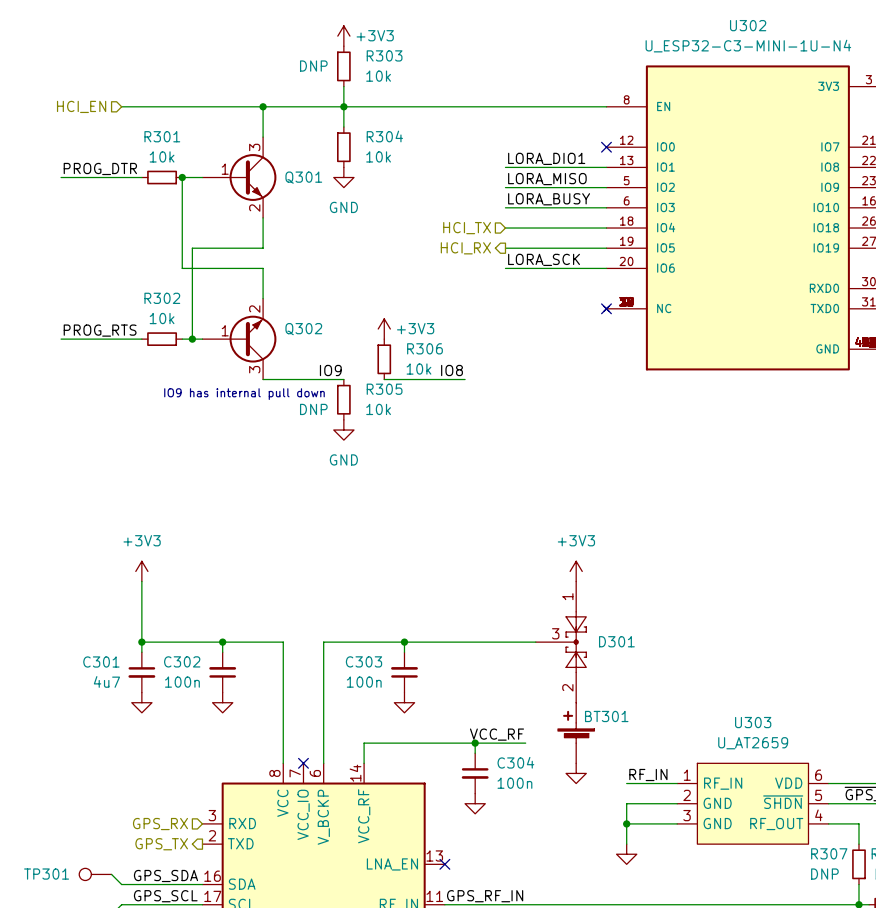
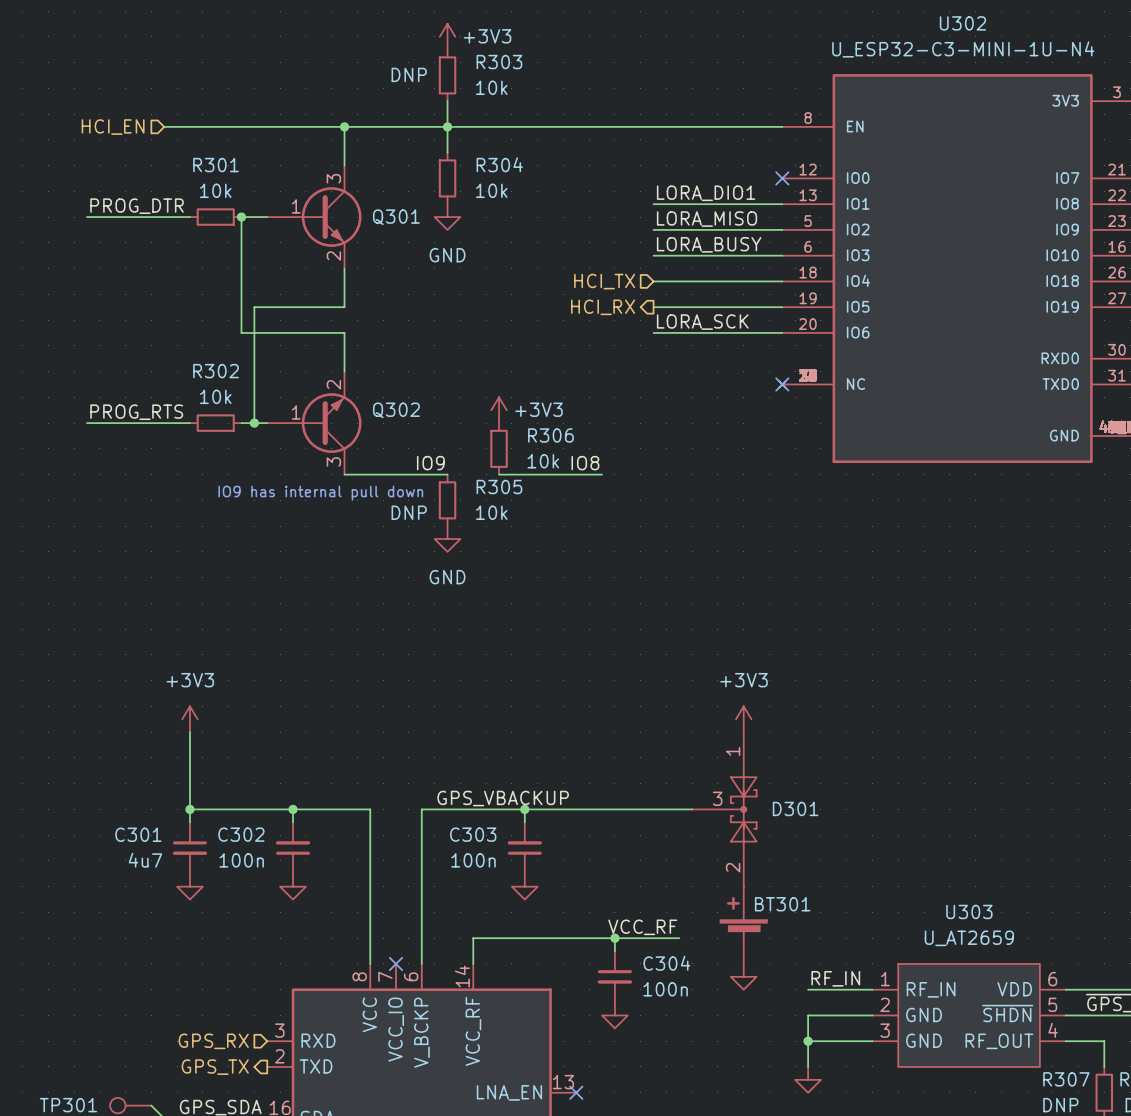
label: none -> GPS_VBACKUP (503, 798)

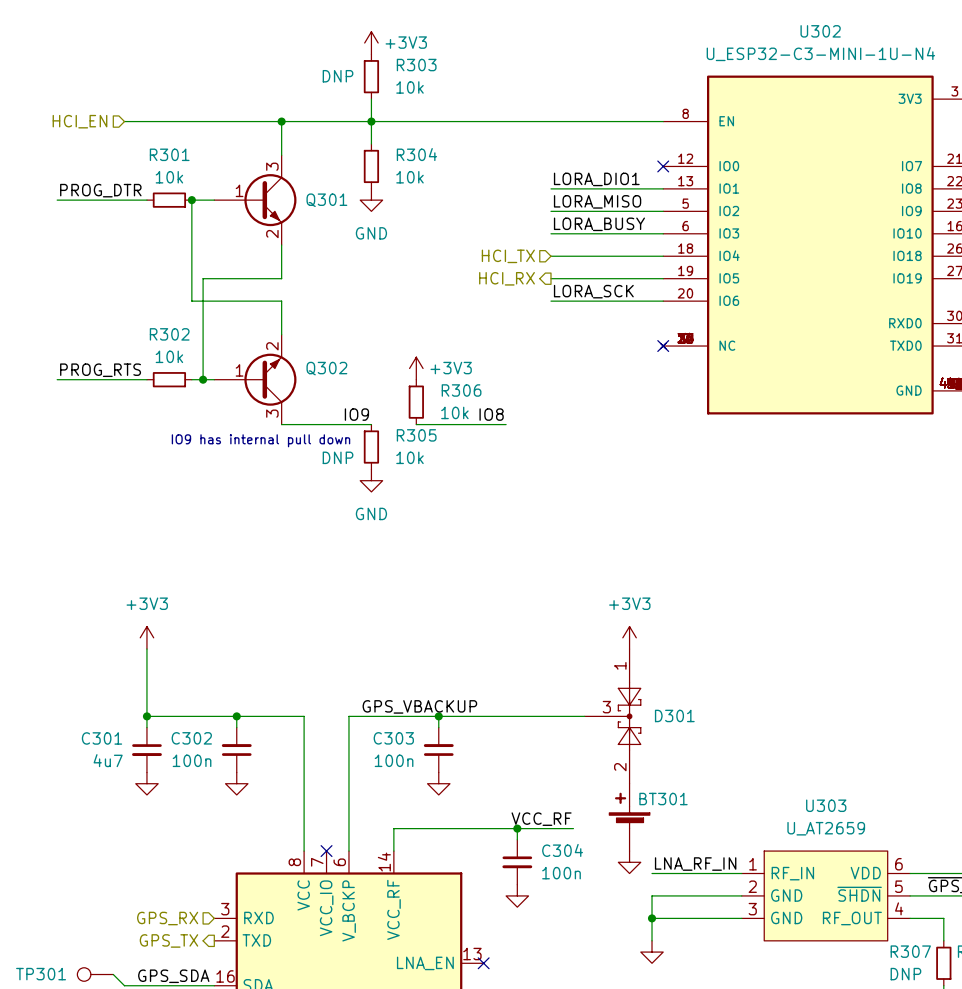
label: RF_IN (835, 978) -> LNA_RF_IN (695, 864)
wire: none -> (652, 873) (685, 873)
wire: (808, 1015) (808, 1066) -> (685, 895) (652, 895) (652, 940)
wire: none -> (652, 918) (685, 918)
junction position: (808, 1041) -> (652, 918)
power symbol position: (808, 1079) -> (652, 952)

